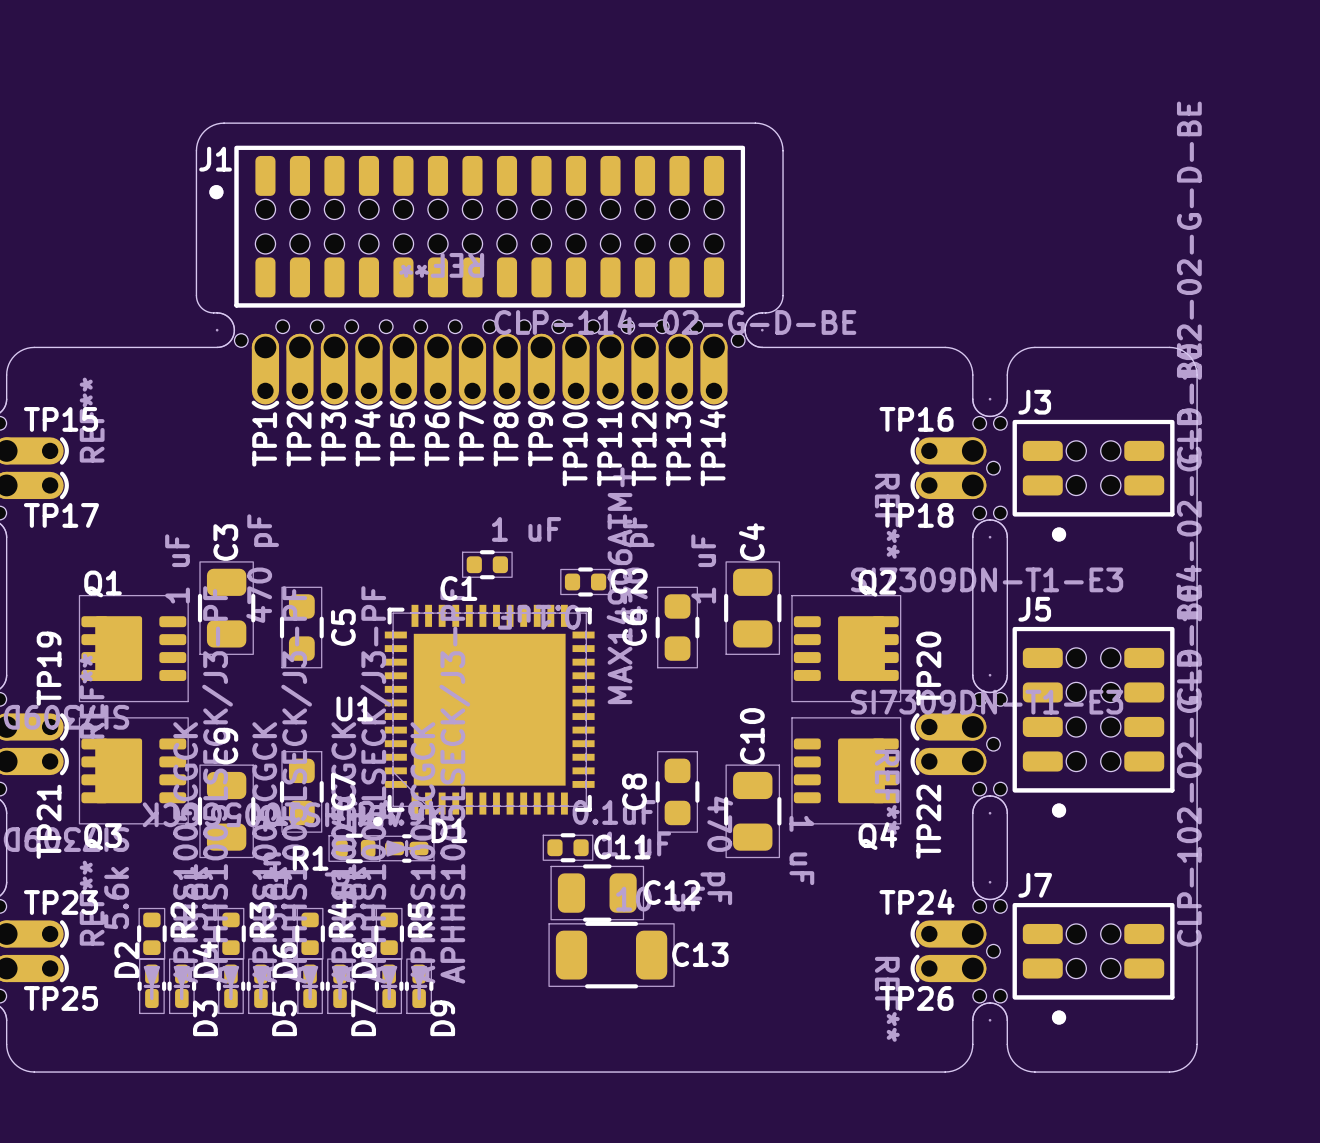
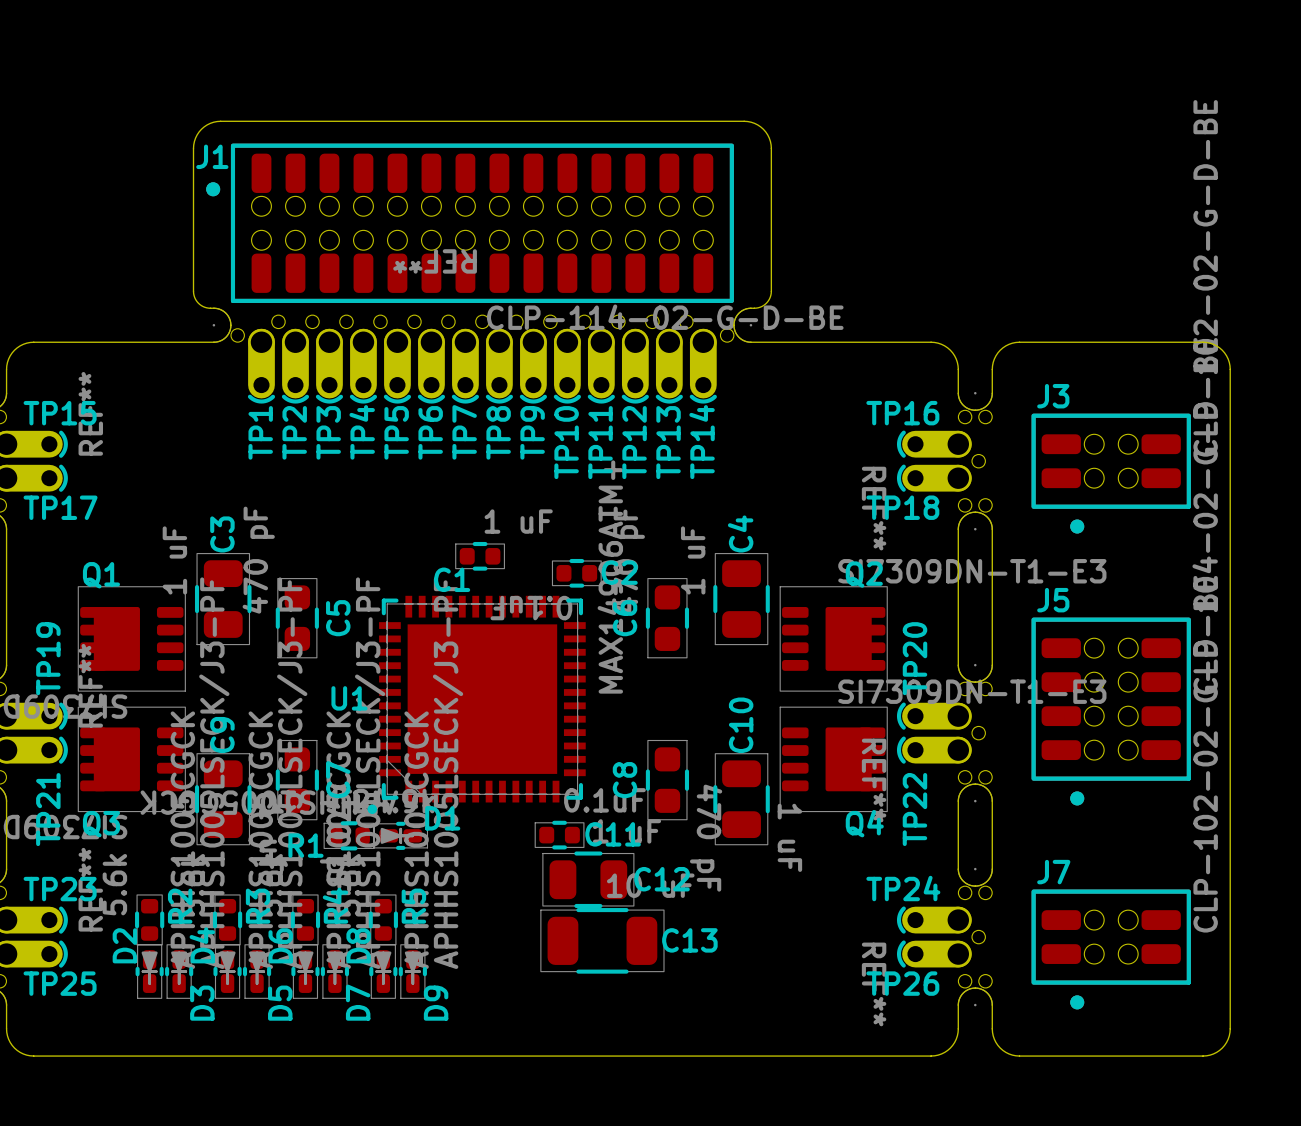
board edge: (1169, 347) (1180, 349) (1188, 355) (1194, 364) (1197, 375) (1197, 1044) (1194, 1054) (1188, 1063) (1180, 1069) (1169, 1072) -> (1152, 342) (1203, 342) (1213, 344) (1224, 352) (1230, 369) (1229, 1032) (1224, 1045) (1210, 1055) (1152, 1056)
J3 position: (1093, 480) -> (1111, 473)
J5 position: (1093, 722) -> (1111, 711)
J7 position: (1093, 963) -> (1111, 949)

